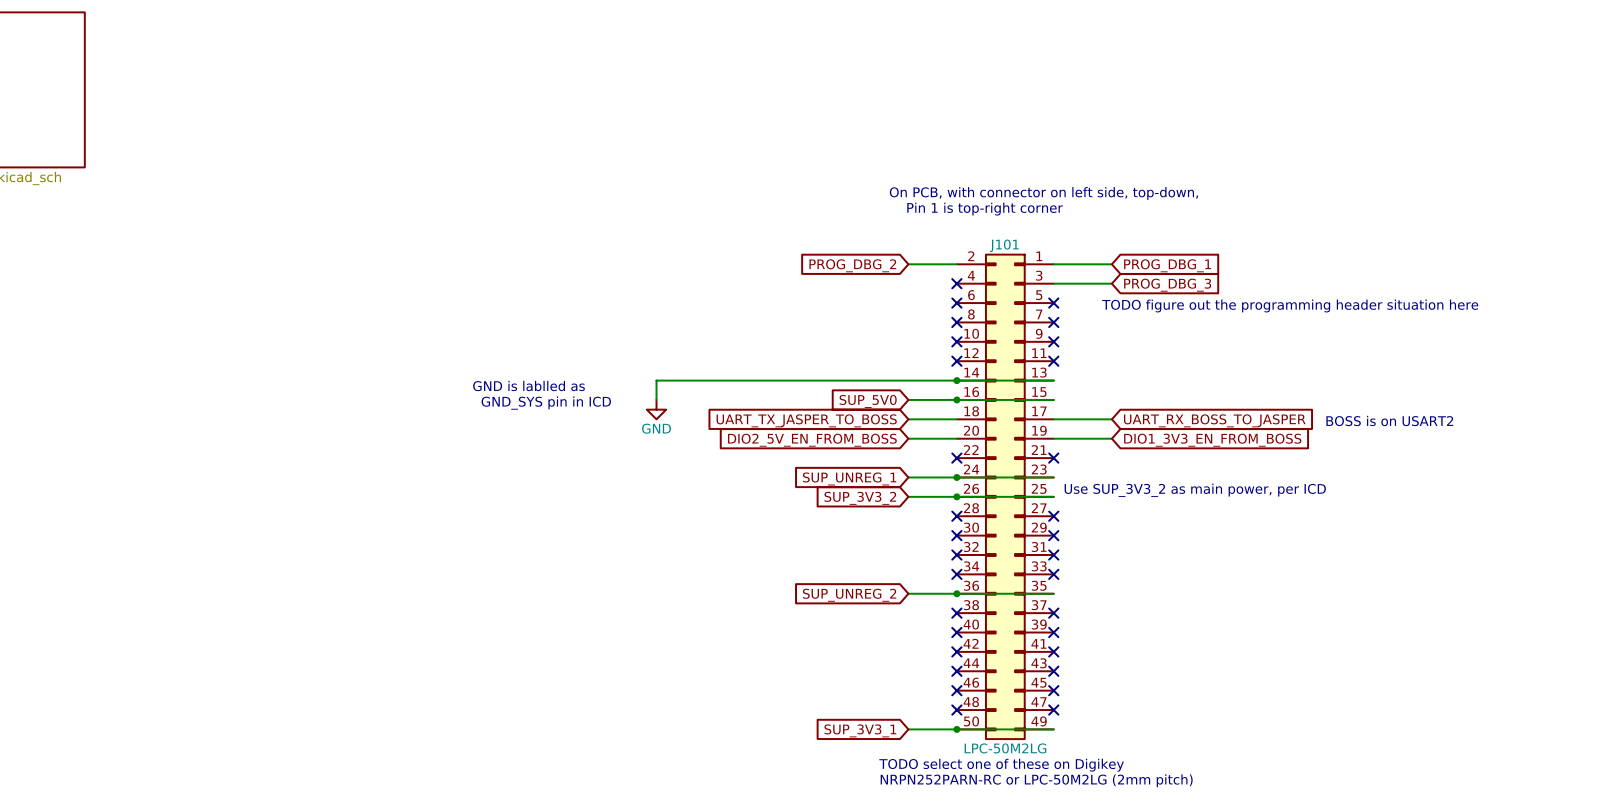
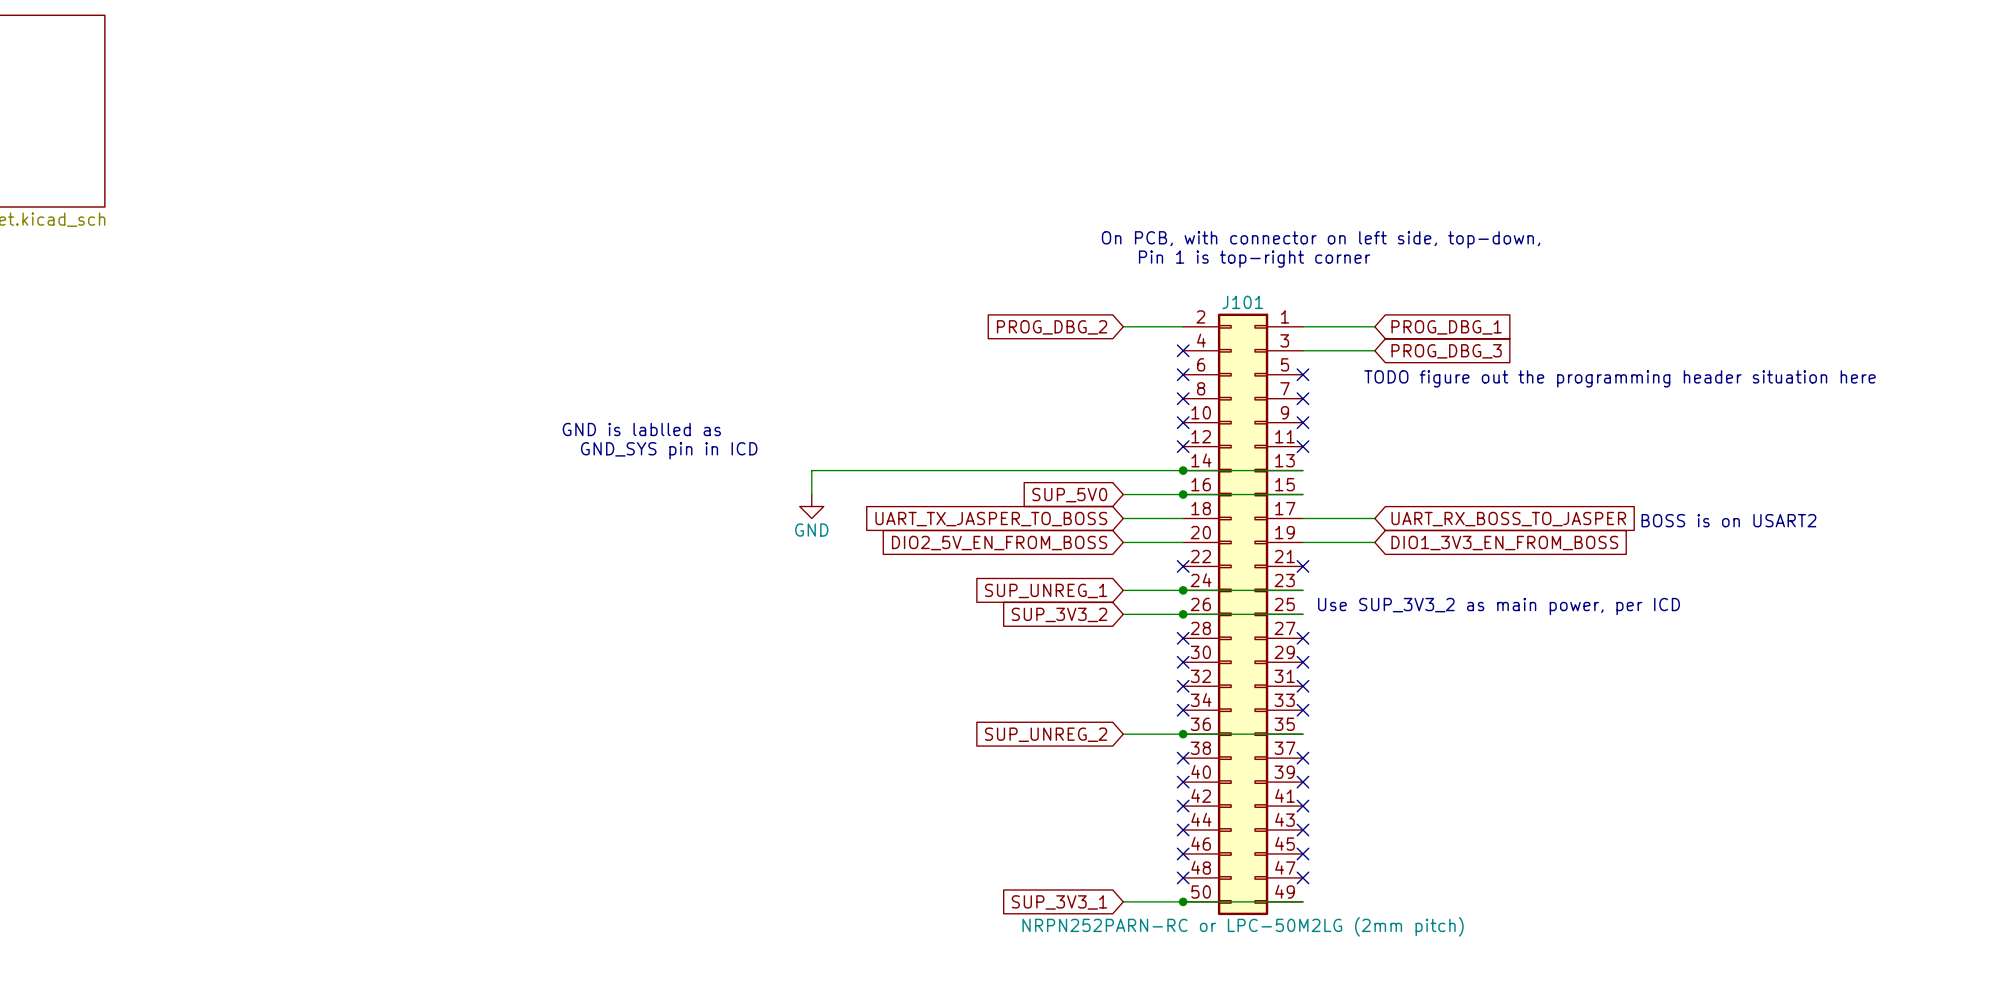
text position: GND is lablled as (529, 386) -> GND is lablled as (641, 429)
text position: GND_SYS pin in ICD (546, 403) -> GND_SYS pin in ICD (669, 450)
J101 value: LPC-50M2LG (1005, 748) -> NRPN252PARN-RC or LPC-50M2LG (2mm pitch) (1243, 926)
text: TODO select one of these on Digikey (1001, 765) -> none
text: NRPN252PARN-RC or LPC-50M2LG (2mm pitch) (1036, 780) -> none

